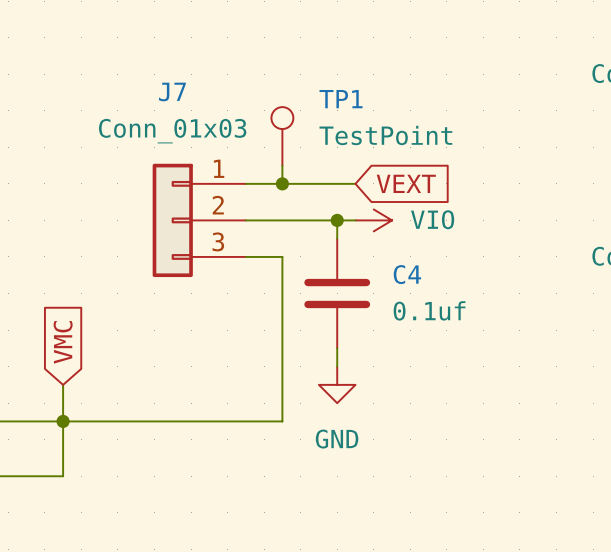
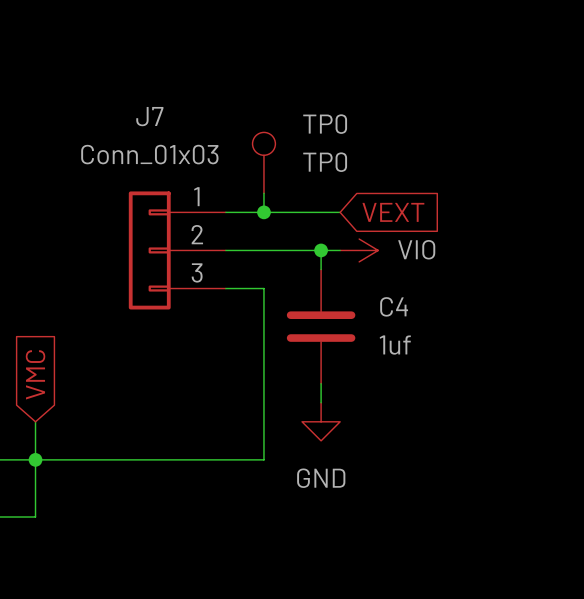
TP1 name: TP1 (341, 99) -> TP0 (325, 124)
TP1 value: TestPoint (385, 135) -> TP0 (325, 162)
C4 value: 0.1uf (429, 310) -> 1uf (395, 345)

